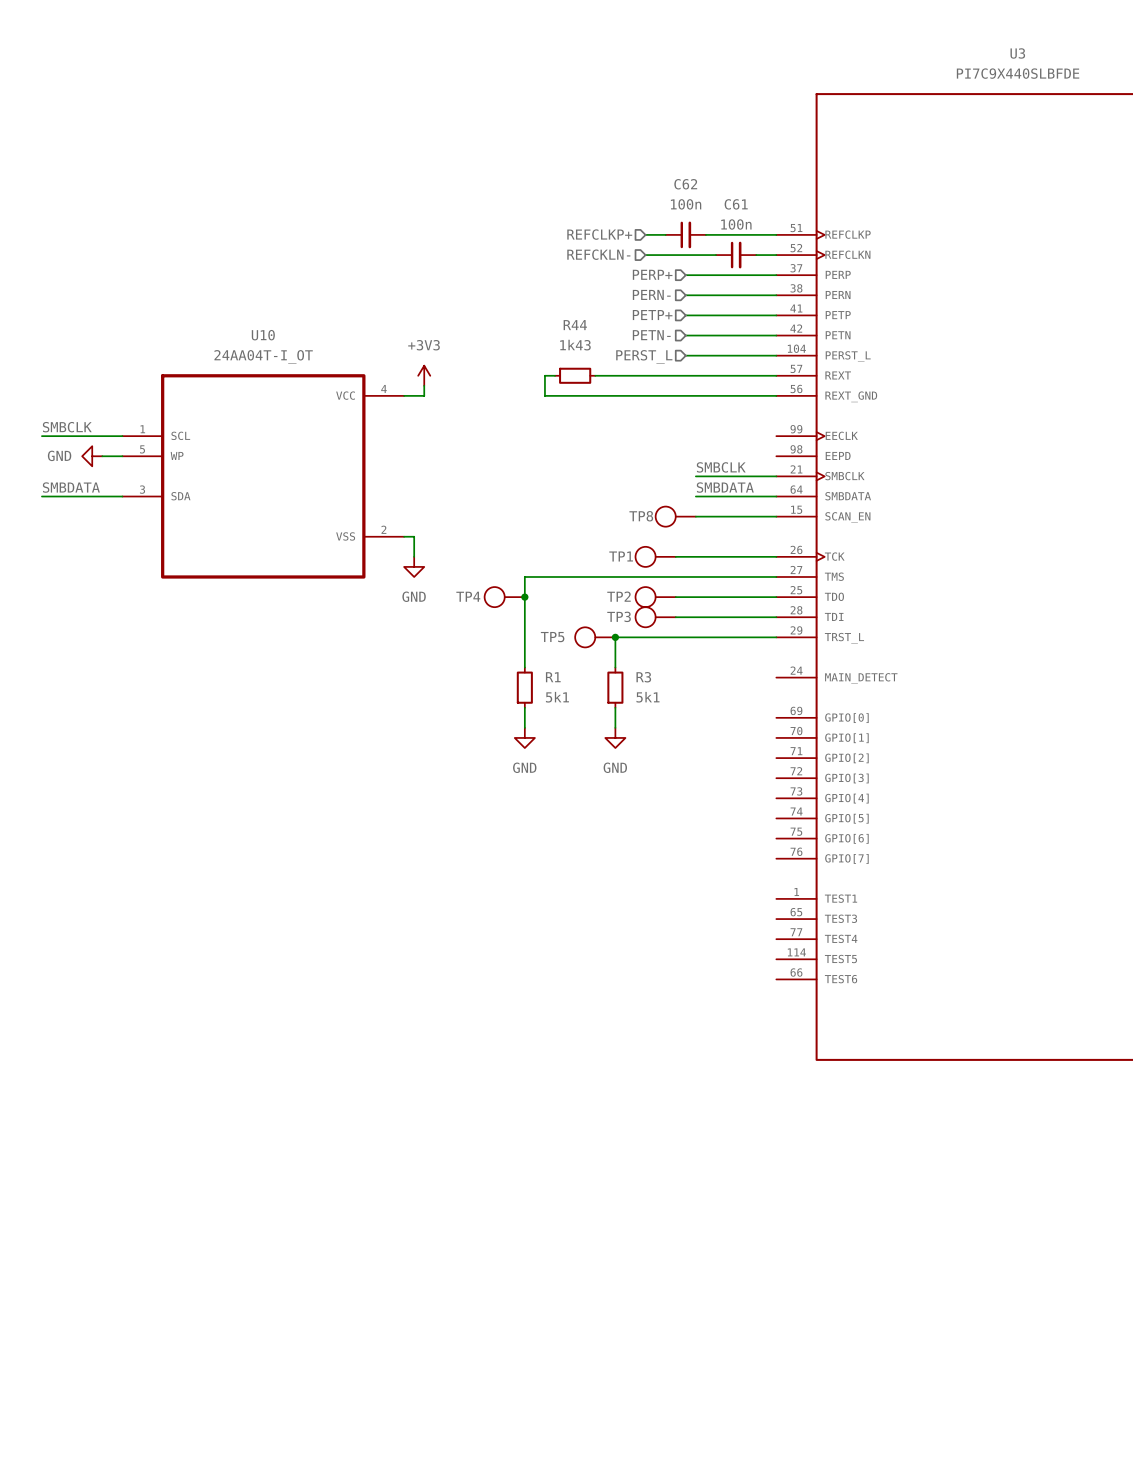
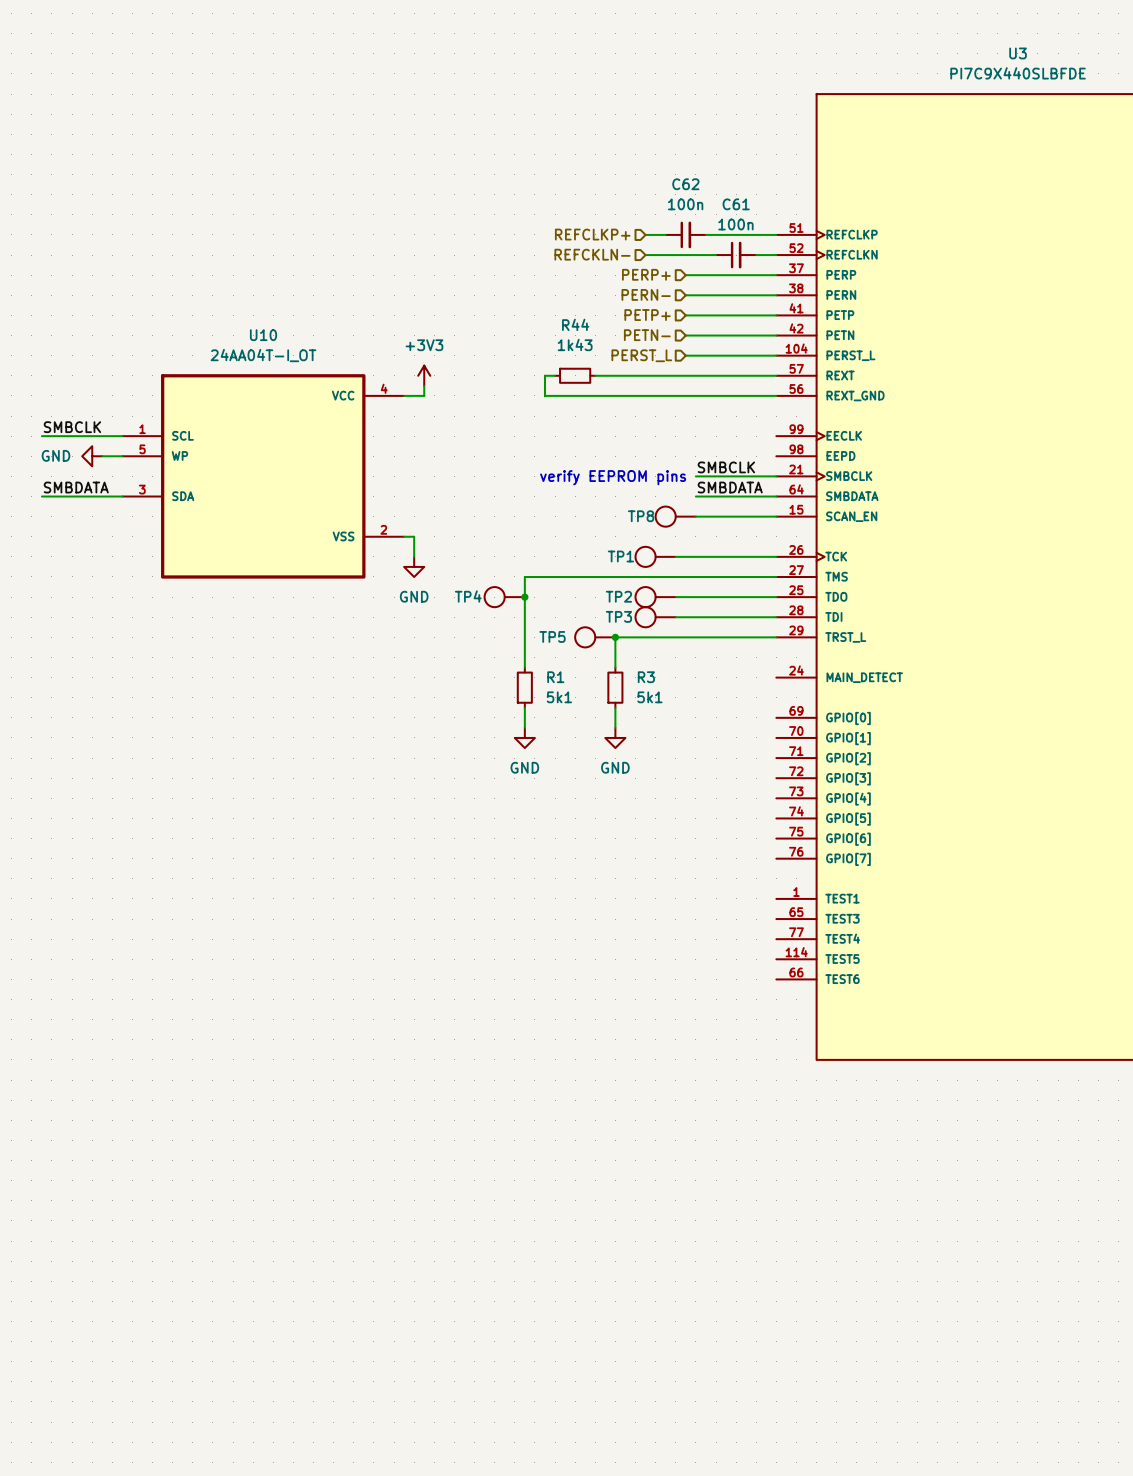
text: none -> verify EEPROM pins (613, 477)

